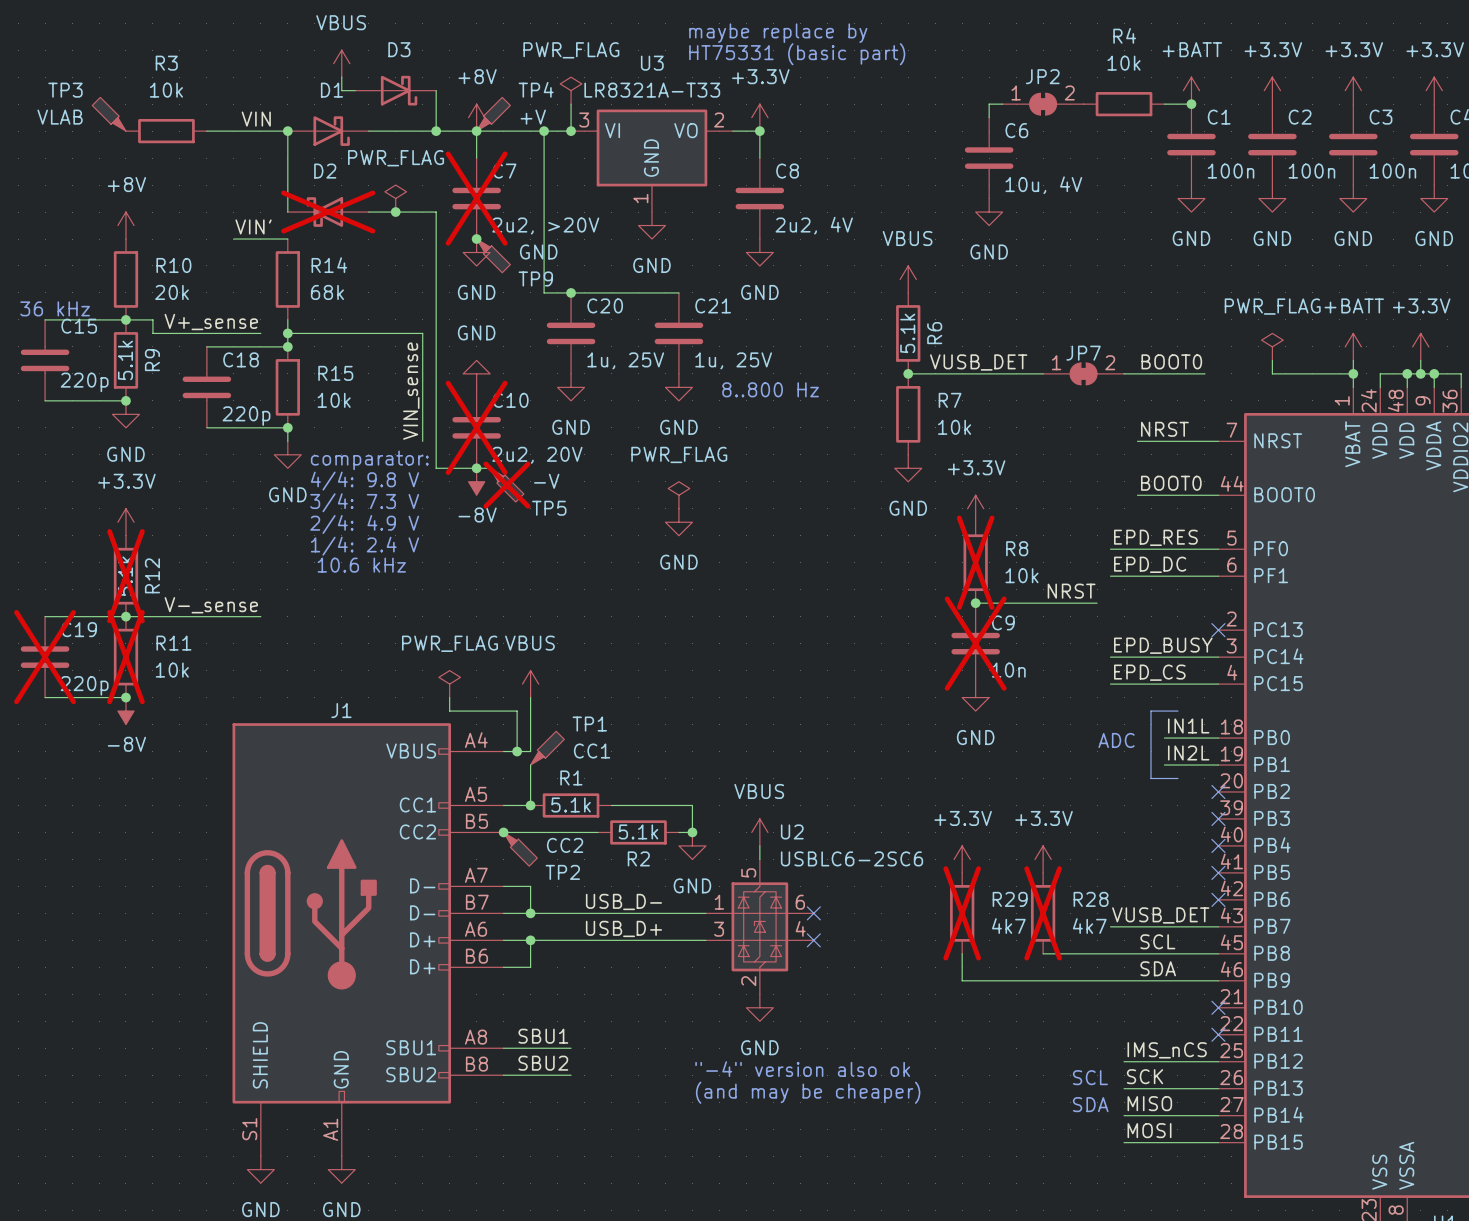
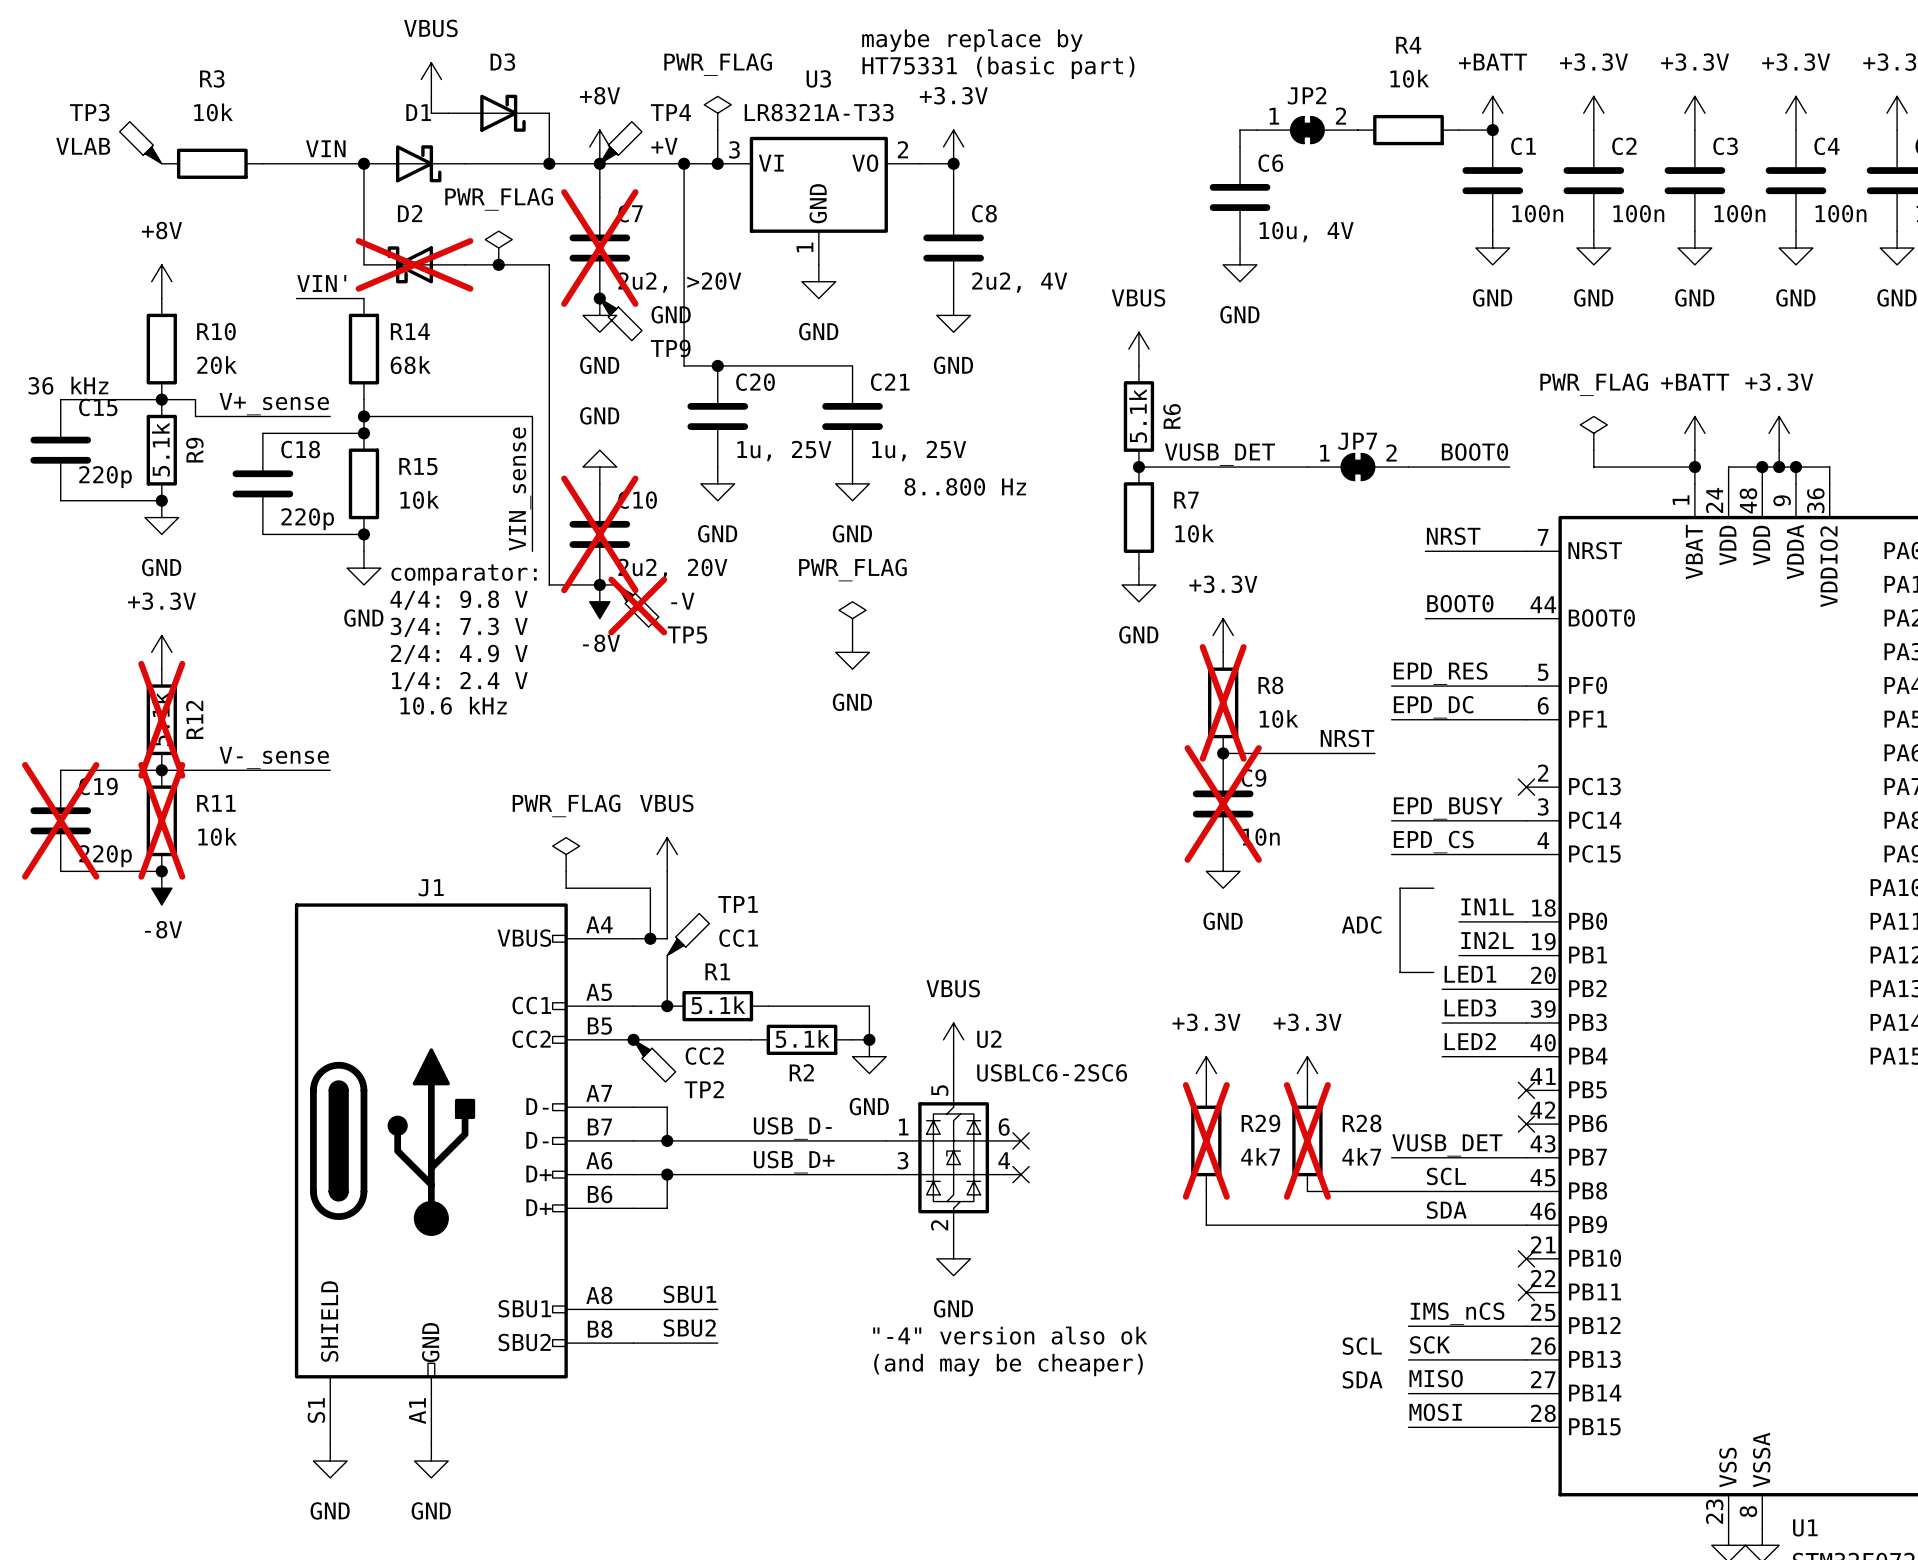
line: (1177, 711) (1151, 711) (1151, 778) (1177, 778) -> (1433, 888) (1400, 888) (1400, 972) (1433, 972)
text position: ADC (1116, 740) -> ADC (1361, 924)
label: none -> LED1 (1470, 974)
wire: none -> (1442, 989) (1526, 989)
no-connect mark: (1218, 791) -> none
label: none -> LED3 (1470, 1007)
wire: none -> (1442, 1022) (1526, 1022)
no-connect mark: (1218, 818) -> none
label: none -> LED2 (1470, 1041)
wire: none -> (1442, 1056) (1526, 1056)
no-connect mark: (1218, 845) -> none

